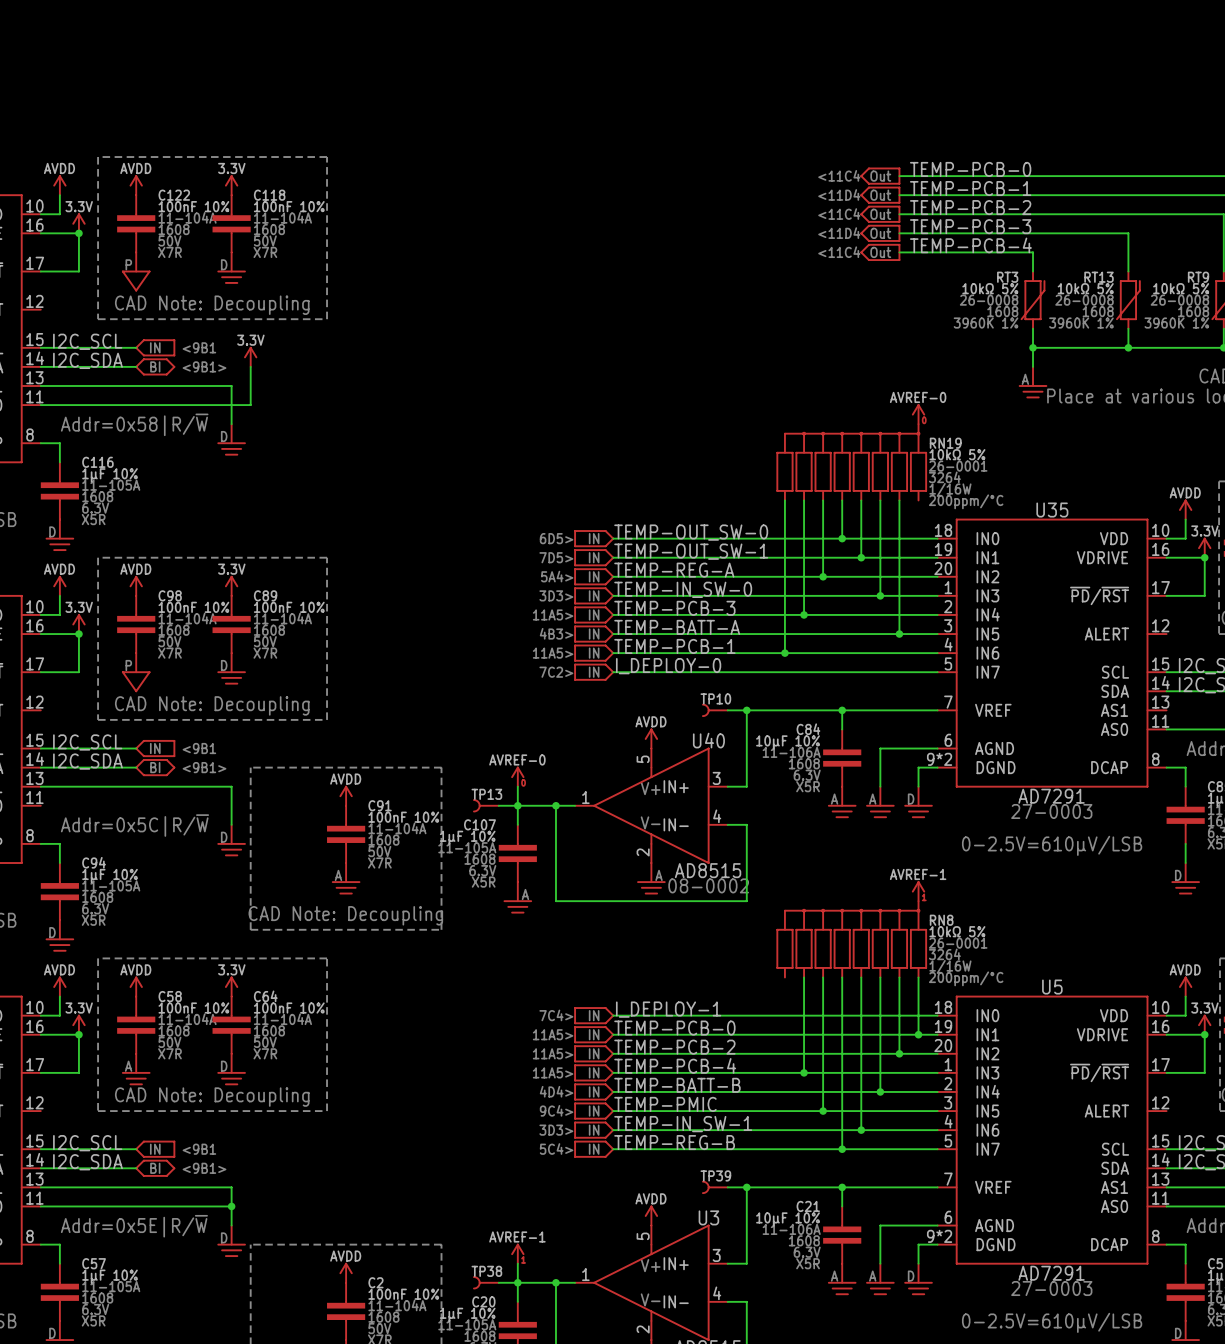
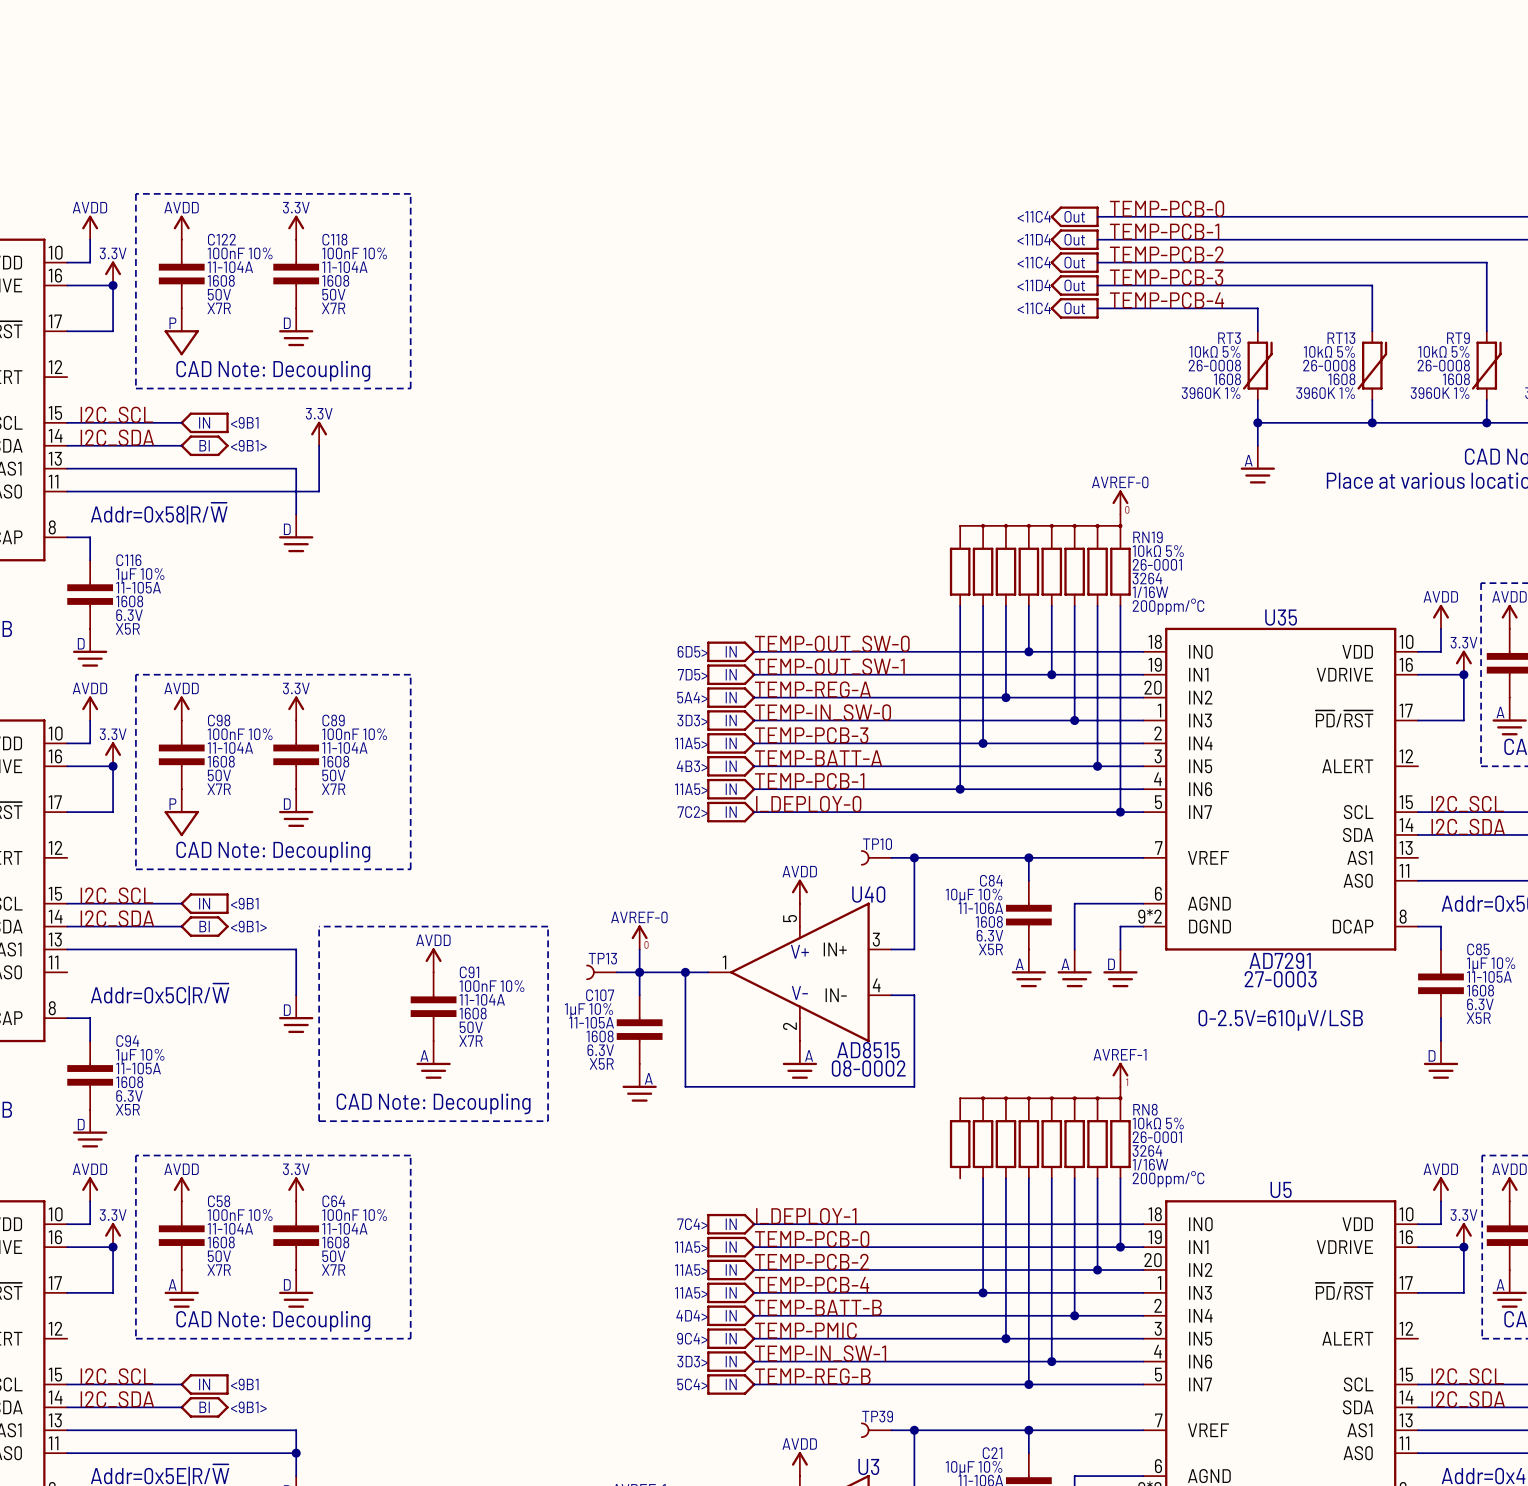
wire: none -> (1120, 606) (1120, 812)
junction: none -> (1120, 812)

